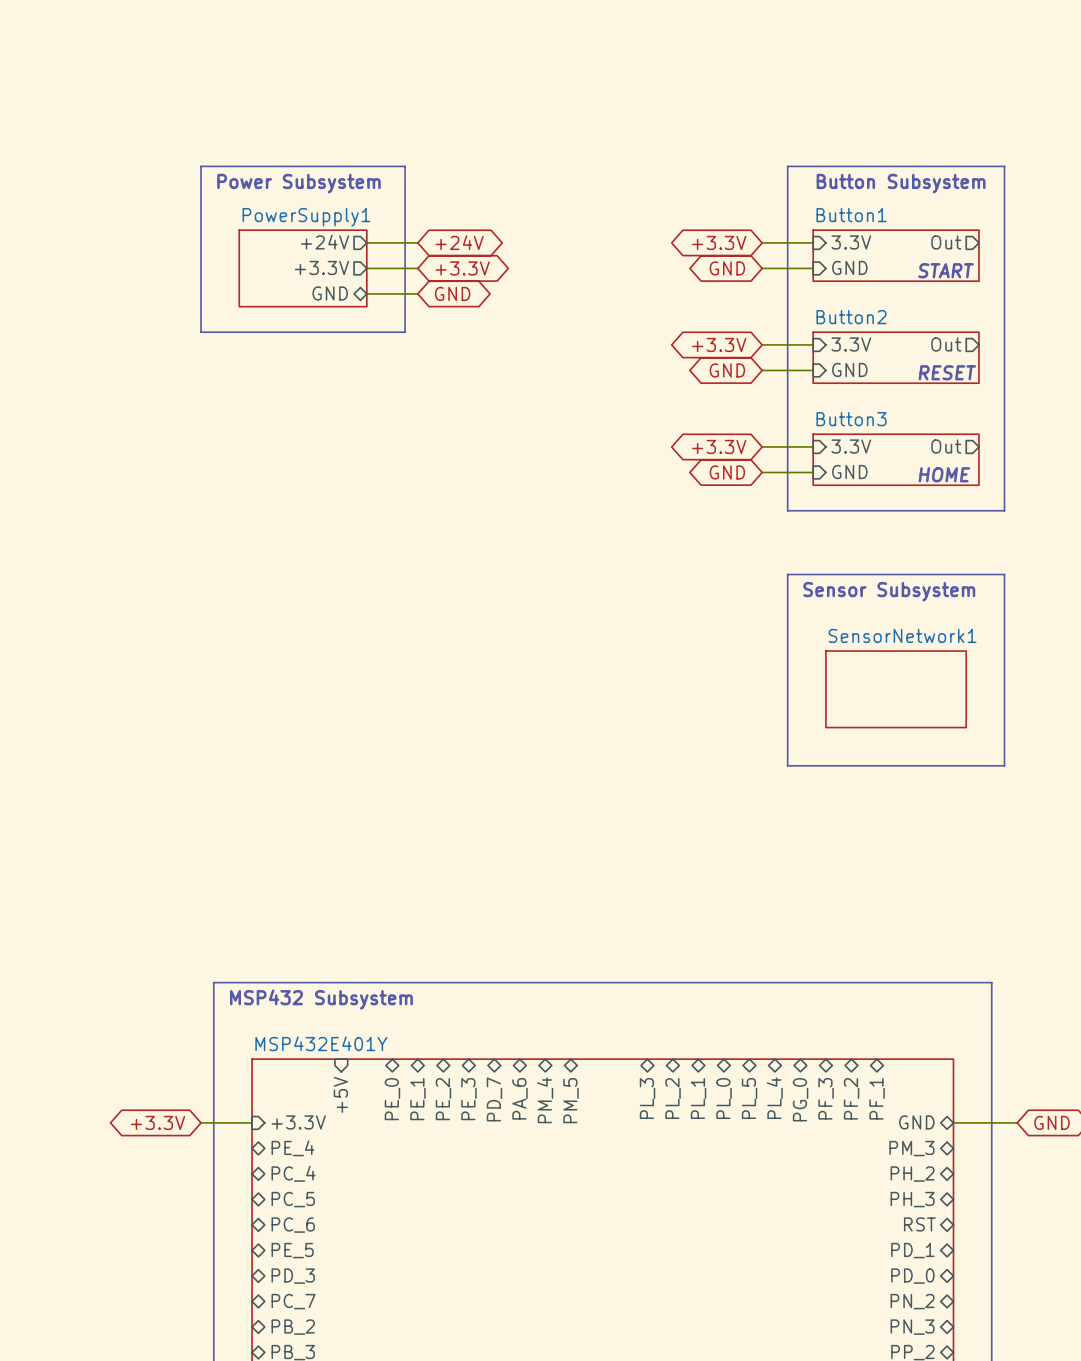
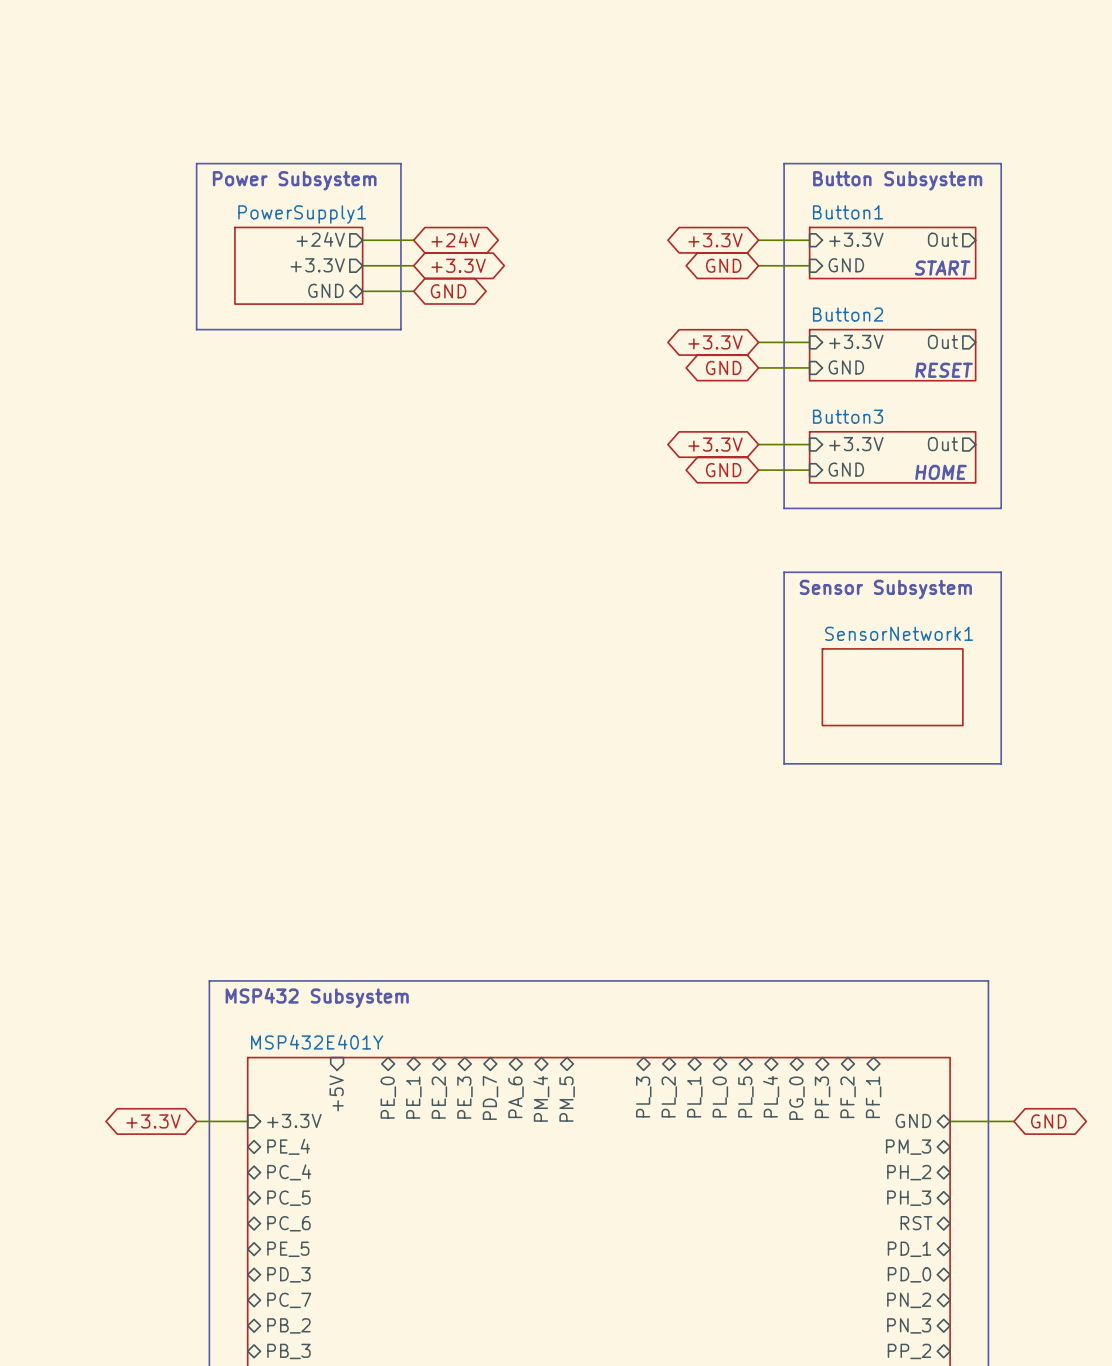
sheet pin: 3.3V (851, 242) -> +3.3V (856, 239)
sheet pin: 3.3V (851, 344) -> +3.3V (856, 341)
sheet pin: 3.3V (851, 446) -> +3.3V (856, 444)

